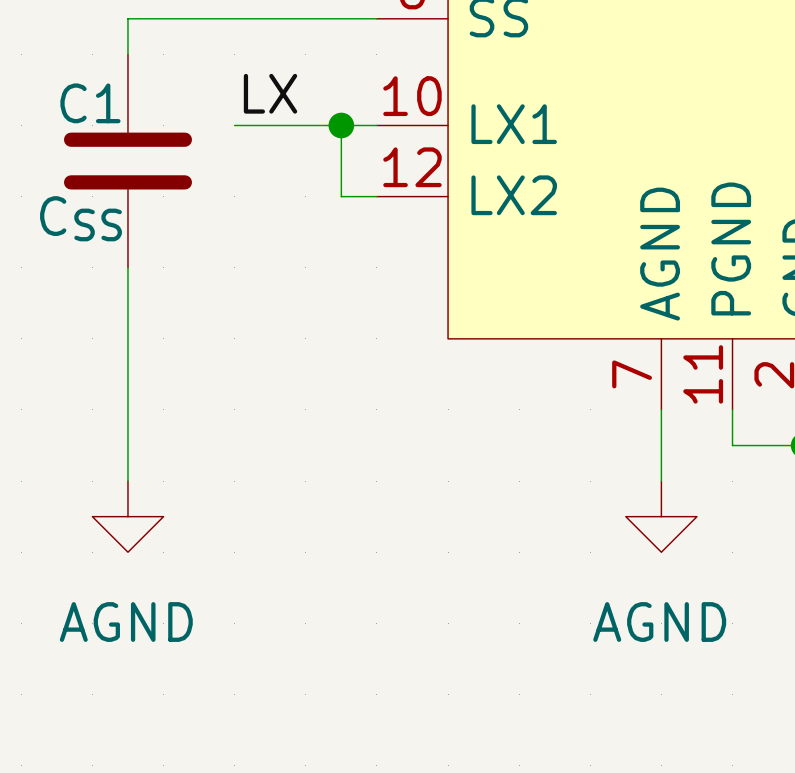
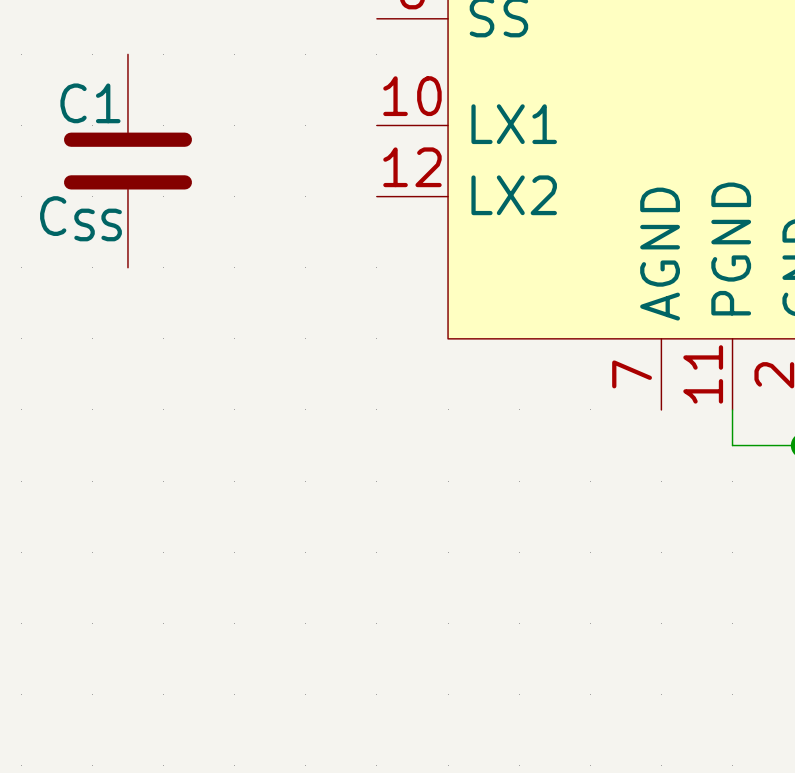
wire: (376, 18) (127, 18) (127, 54) -> none
label: LX (270, 93) -> none
wire: (234, 125) (376, 125) -> none
wire: (341, 125) (341, 196) (376, 196) -> none
junction: (341, 125) -> none
wire: (127, 267) (127, 481) -> none
wire: (661, 409) (661, 481) -> none
power symbol: AGND (127, 516) -> none
power symbol: AGND (661, 516) -> none

